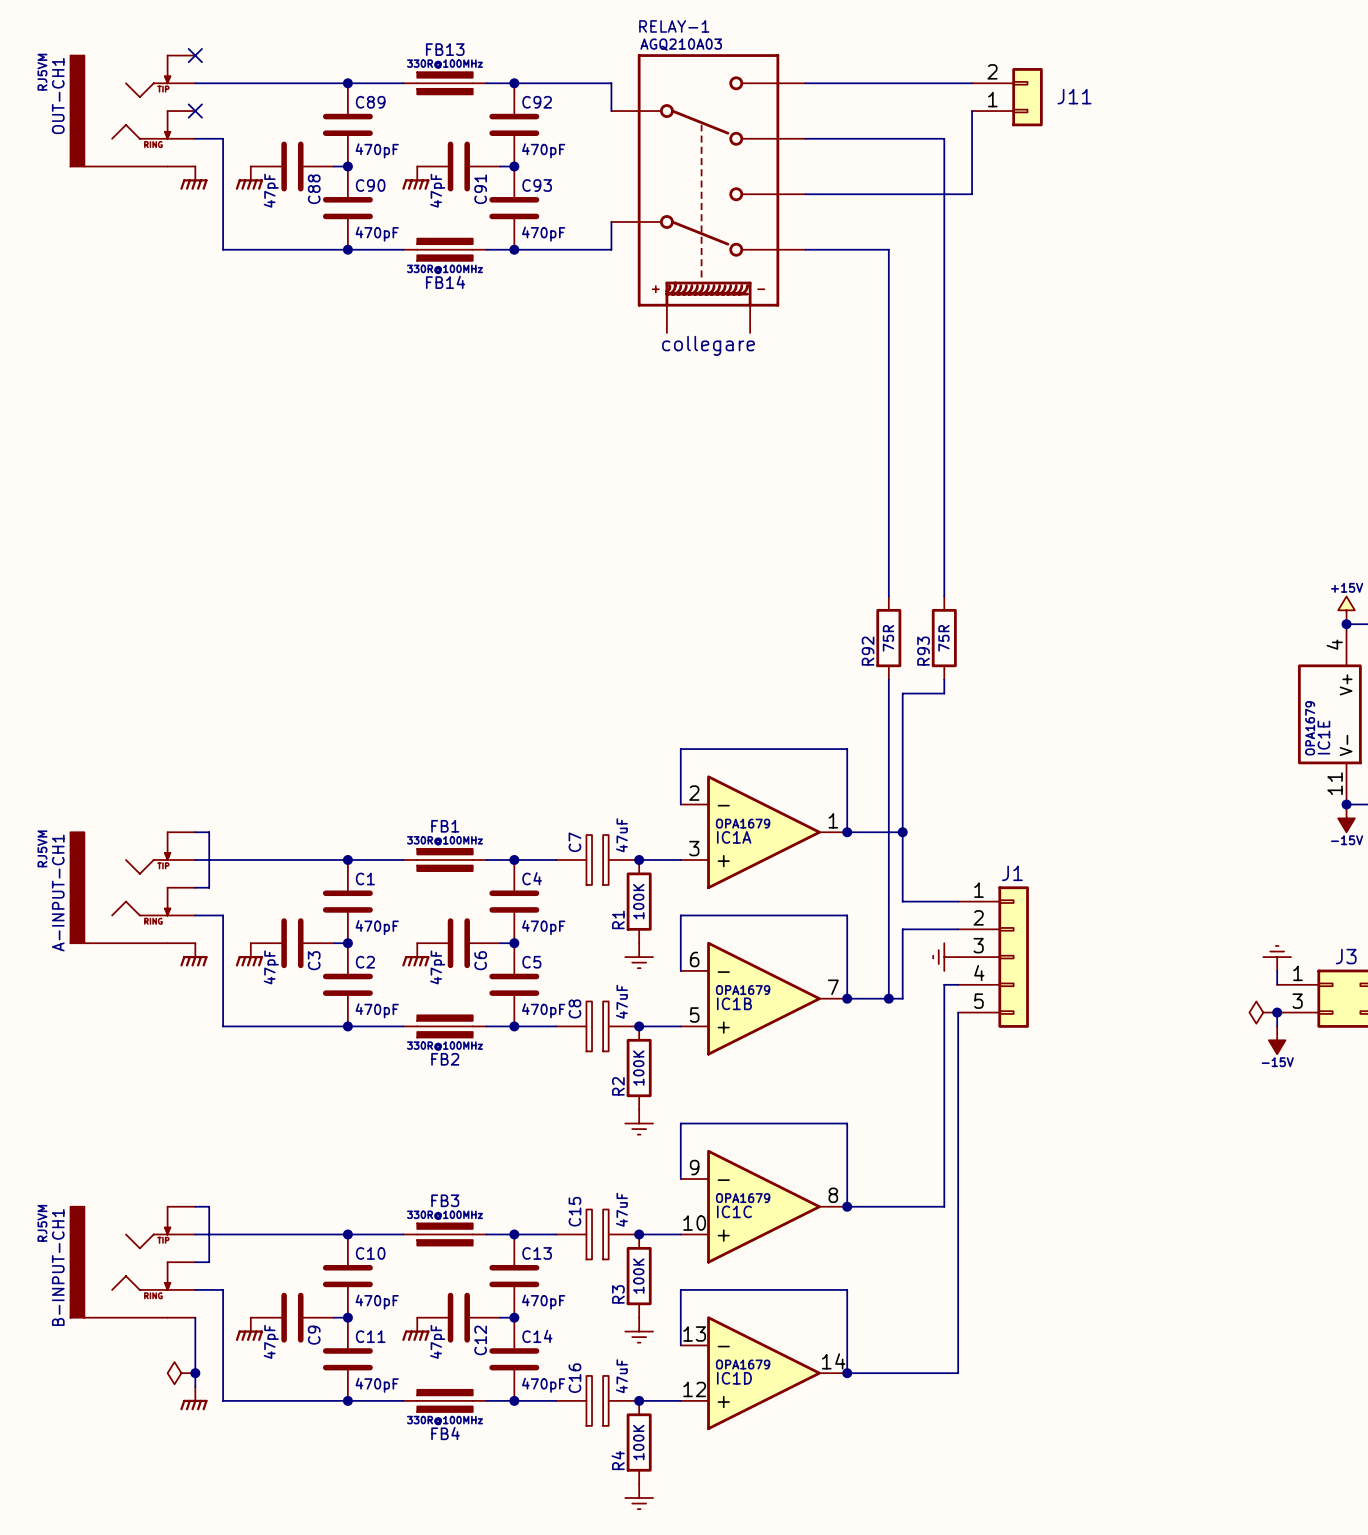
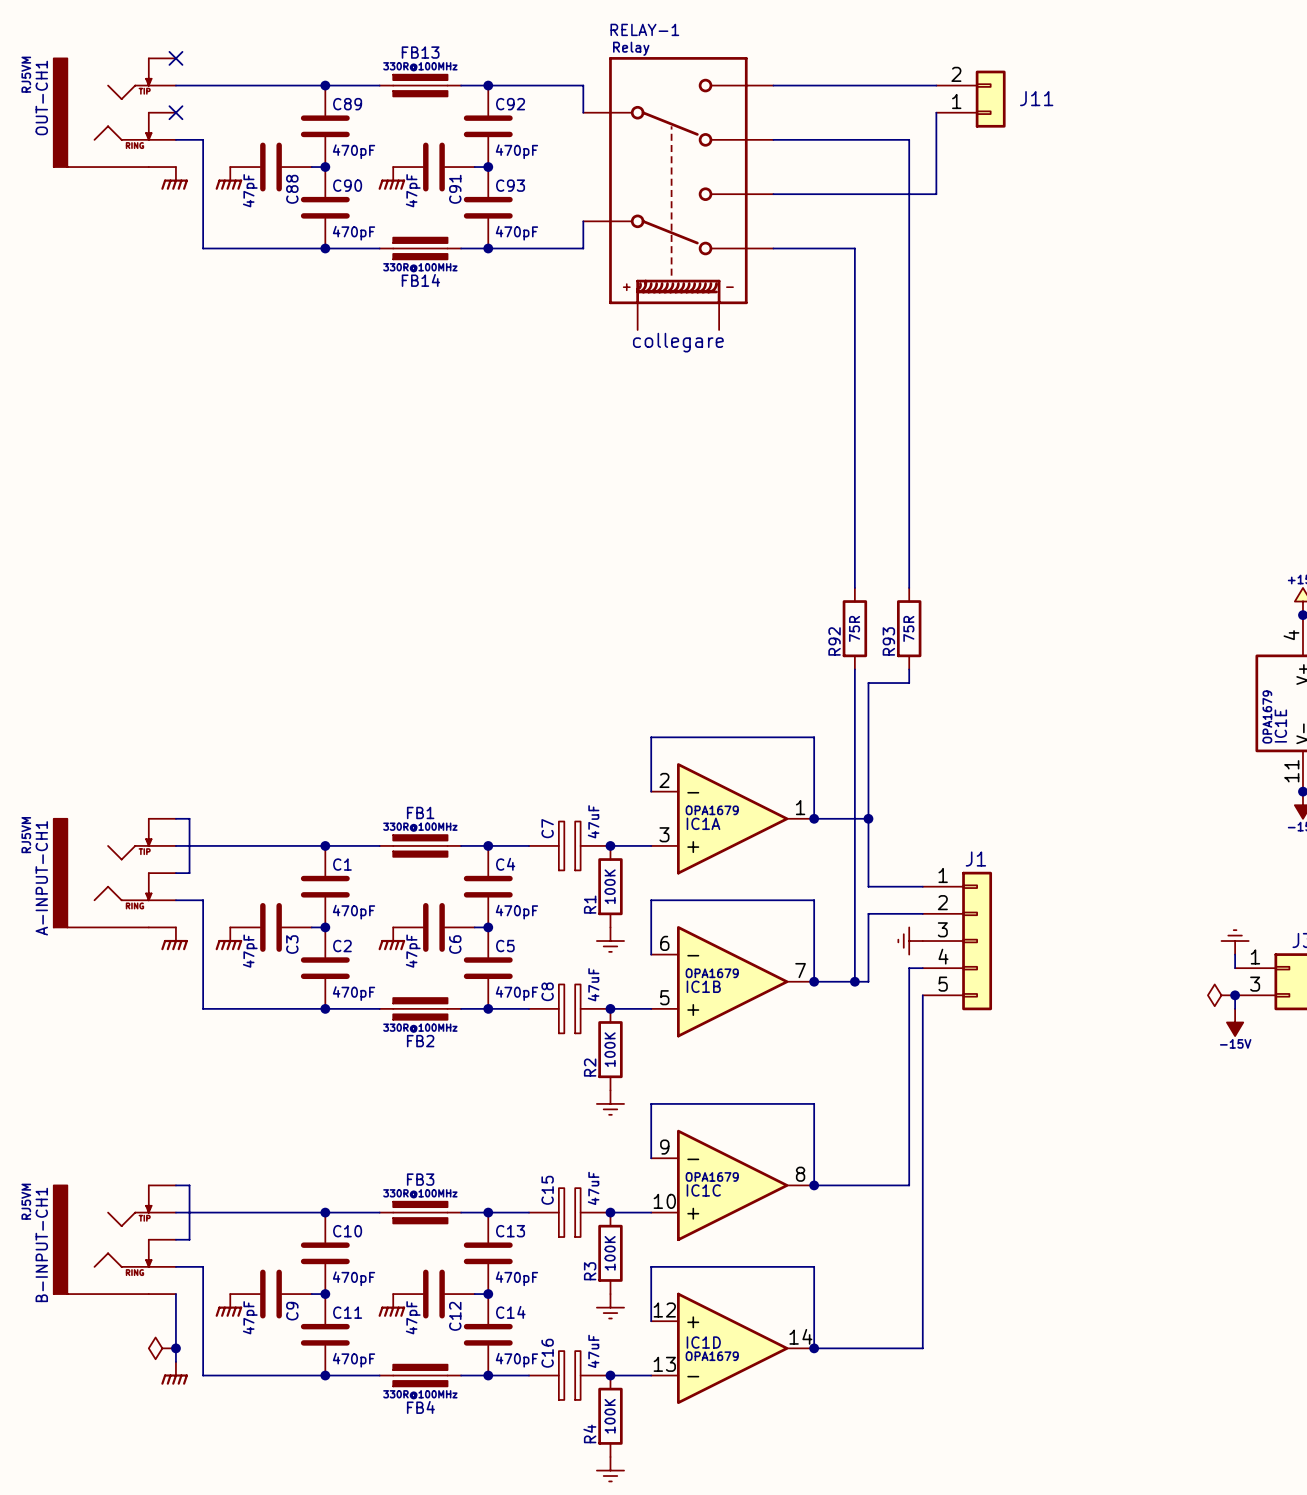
RELAY-1 value: AGQ210A03 (681, 44) -> Relay (631, 48)
IC1D flip: as is (763, 1373) -> up-down (732, 1348)

